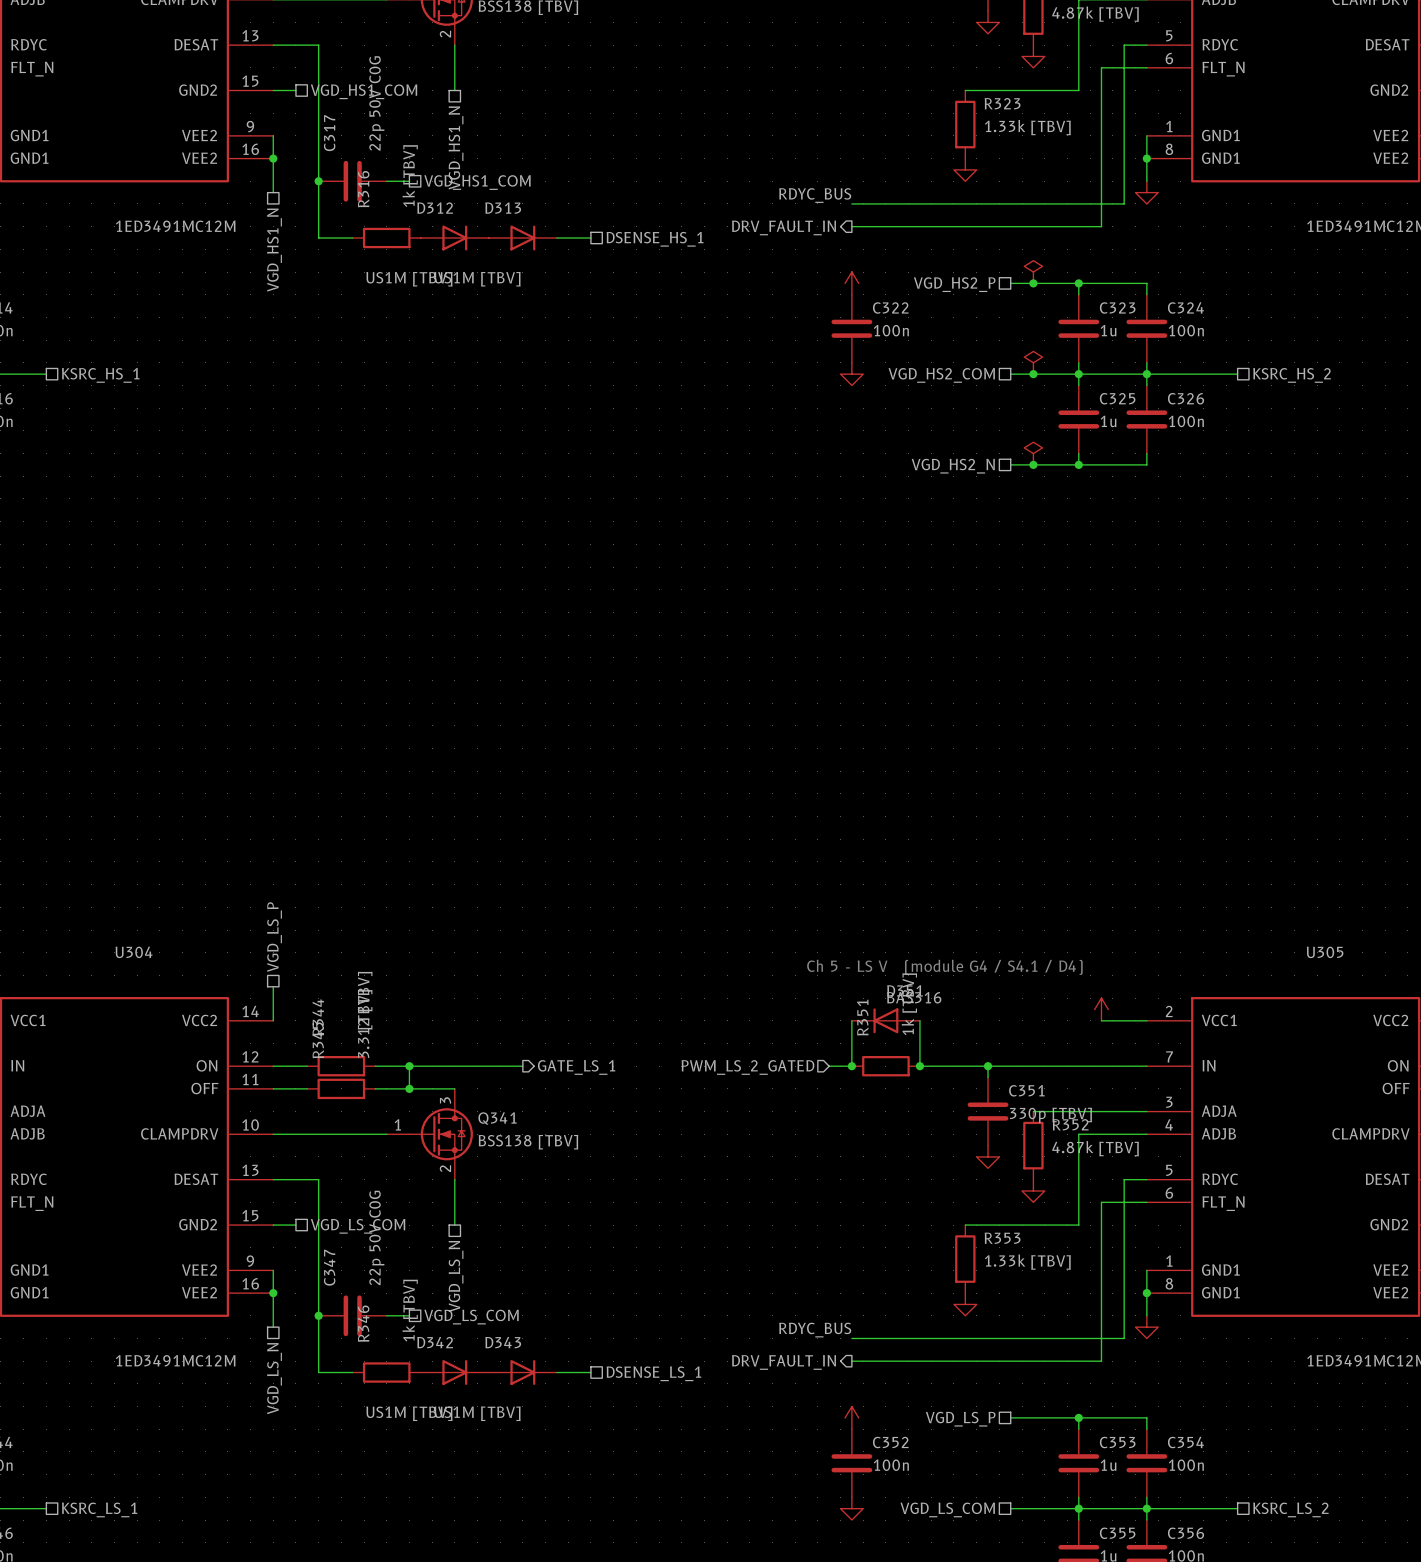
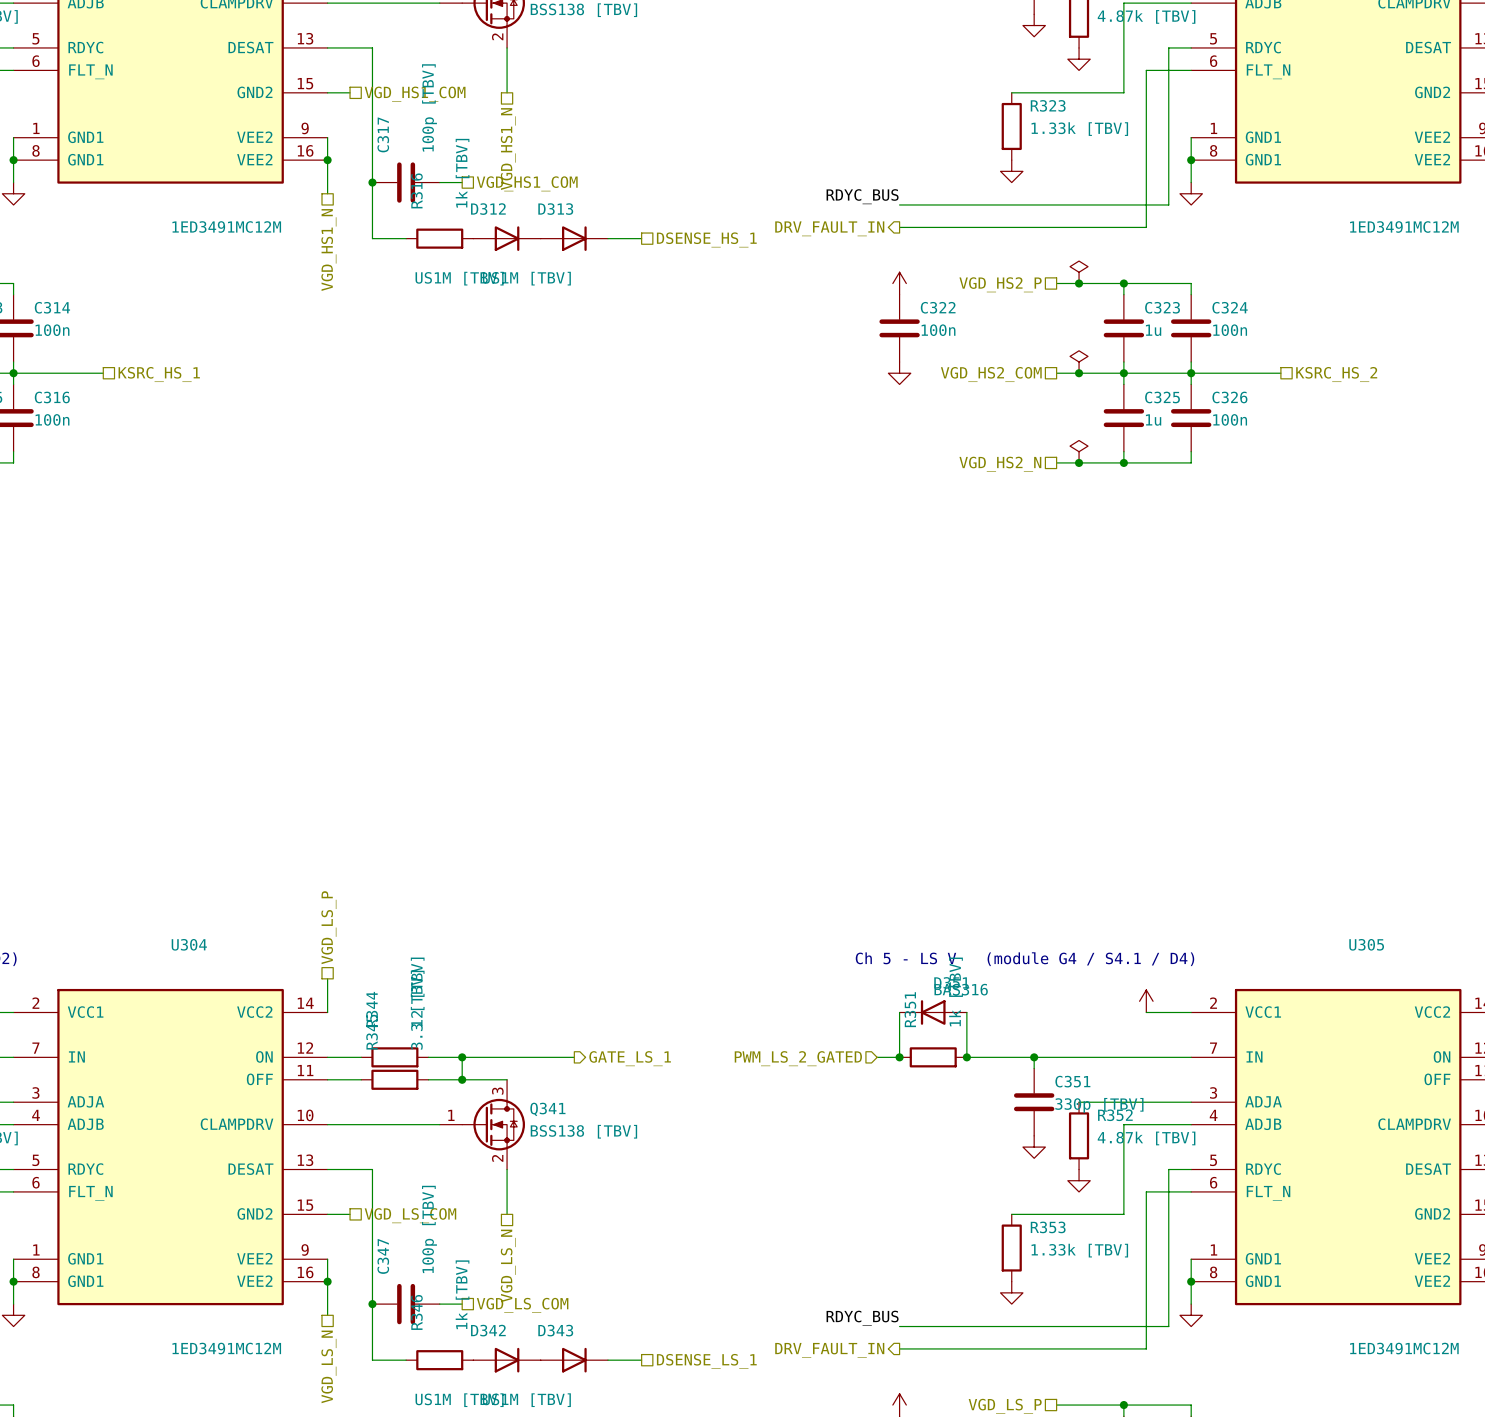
C317 value: 22p 50V C0G (376, 103) -> 100p [TBV] (429, 107)
C347 value: 22p 50V C0G (376, 1237) -> 100p [TBV] (429, 1229)

